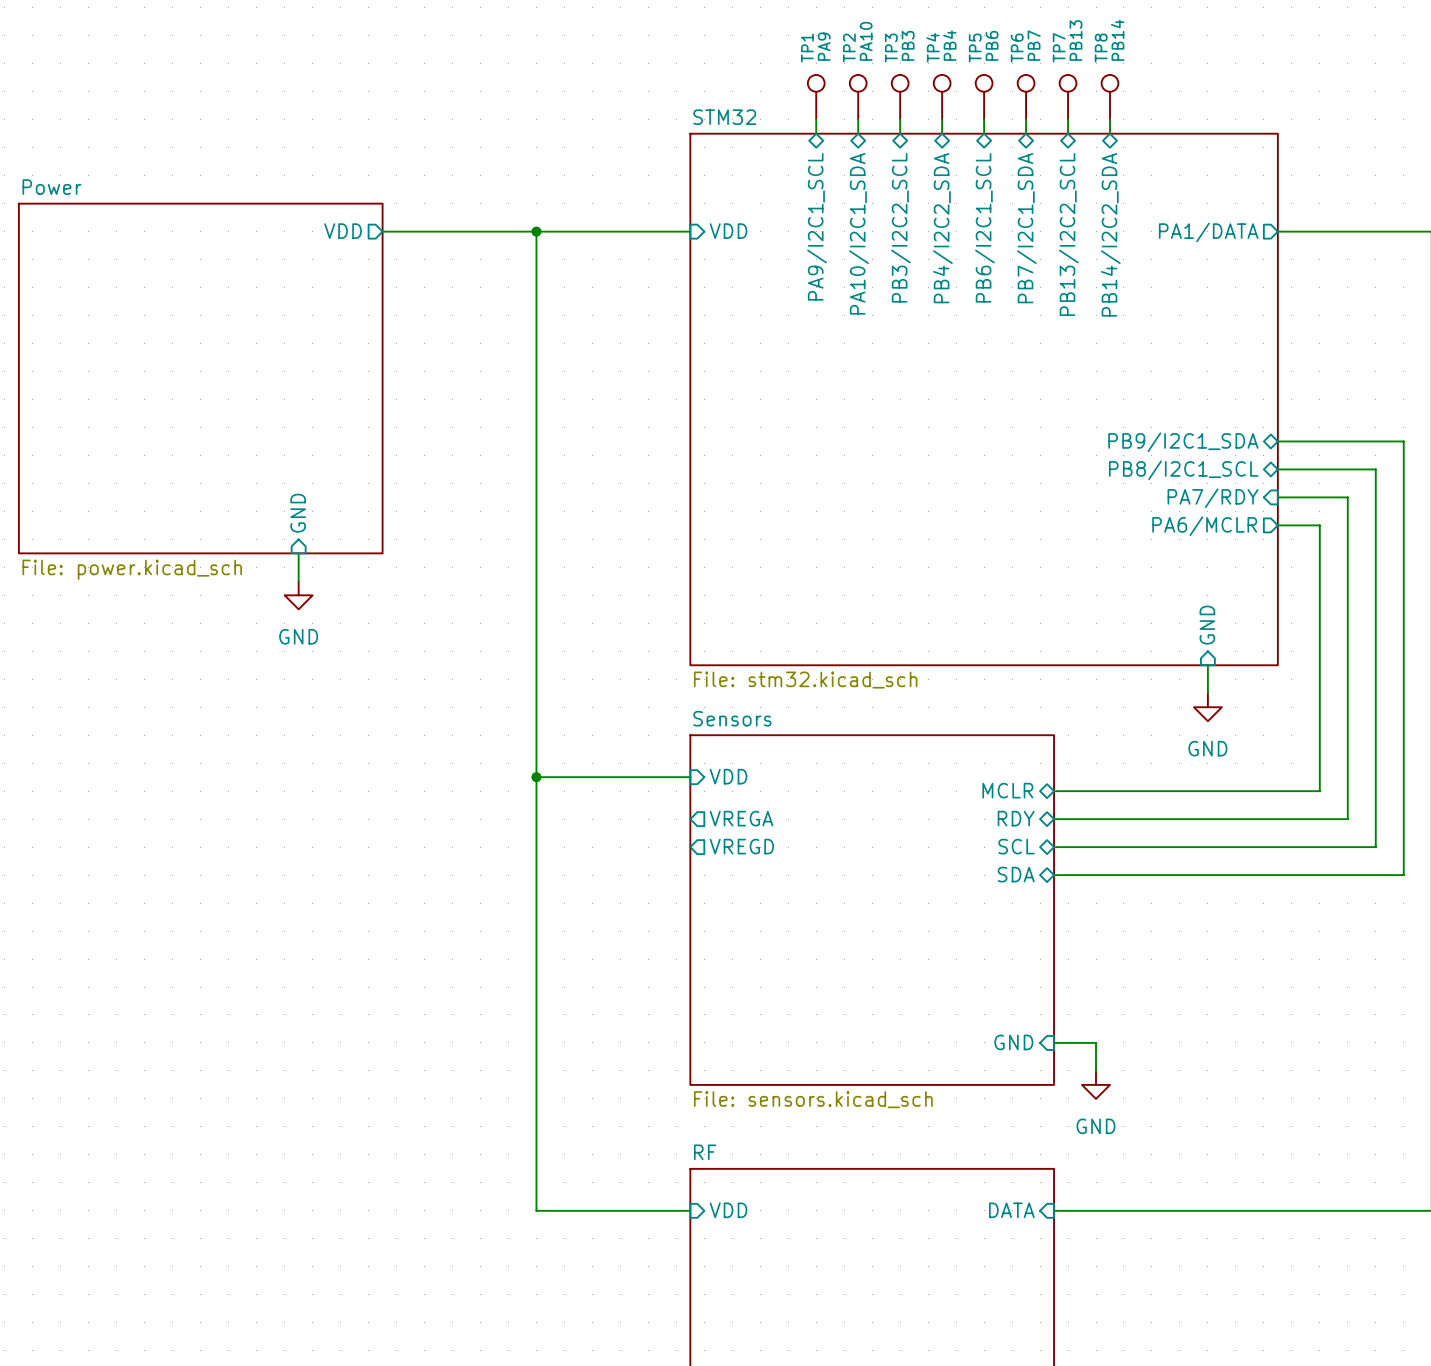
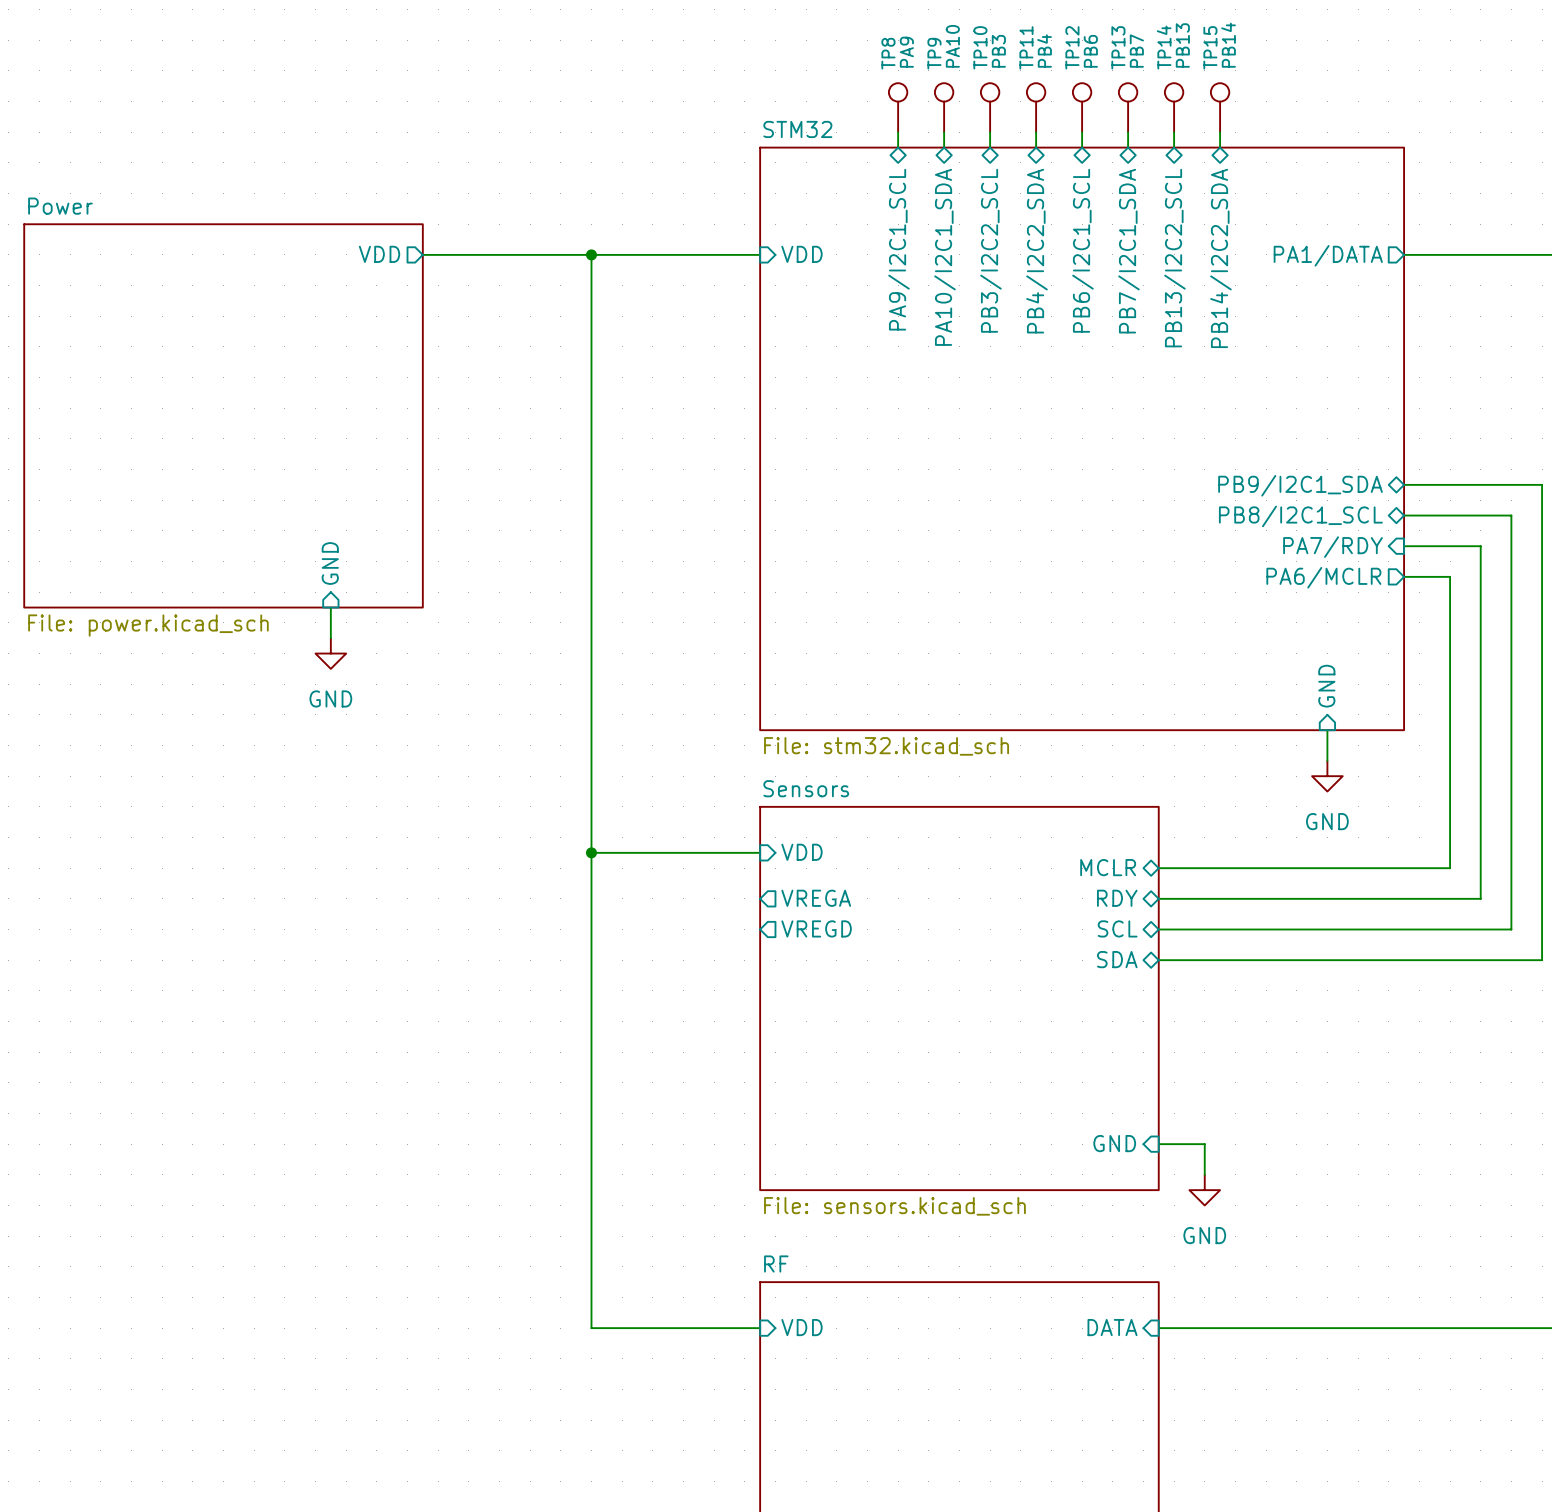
TP4 name: TP4 (933, 47) -> TP11 (1026, 47)
TP7 name: TP7 (1059, 47) -> TP14 (1164, 47)
TP1 name: TP1 (807, 48) -> TP8 (888, 53)
TP2 name: TP2 (849, 48) -> TP9 (934, 53)
TP3 name: TP3 (891, 48) -> TP10 (980, 47)
TP5 name: TP5 (975, 48) -> TP12 (1072, 47)
TP6 name: TP6 (1017, 48) -> TP13 (1118, 47)
TP8 name: TP8 (1101, 48) -> TP15 (1210, 47)

